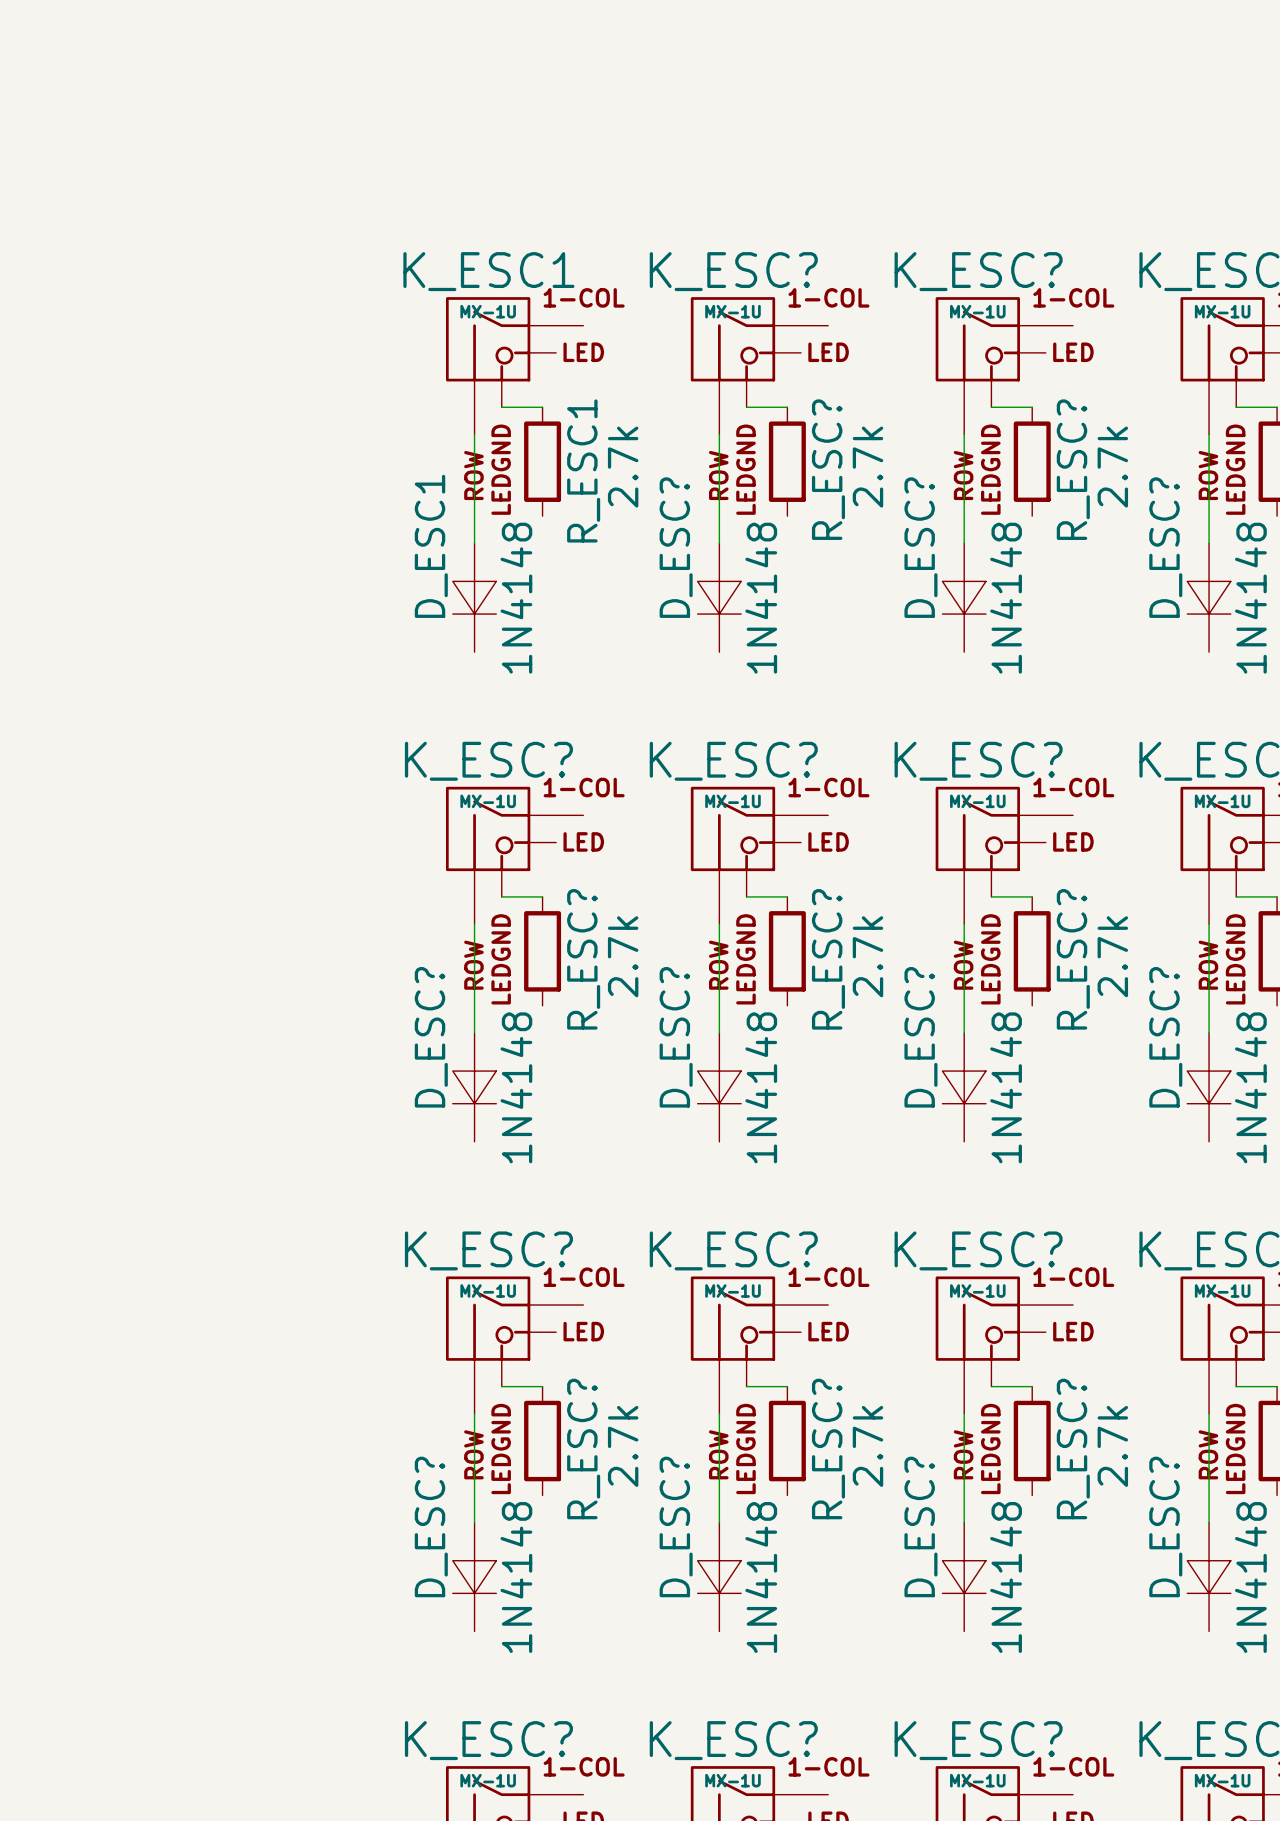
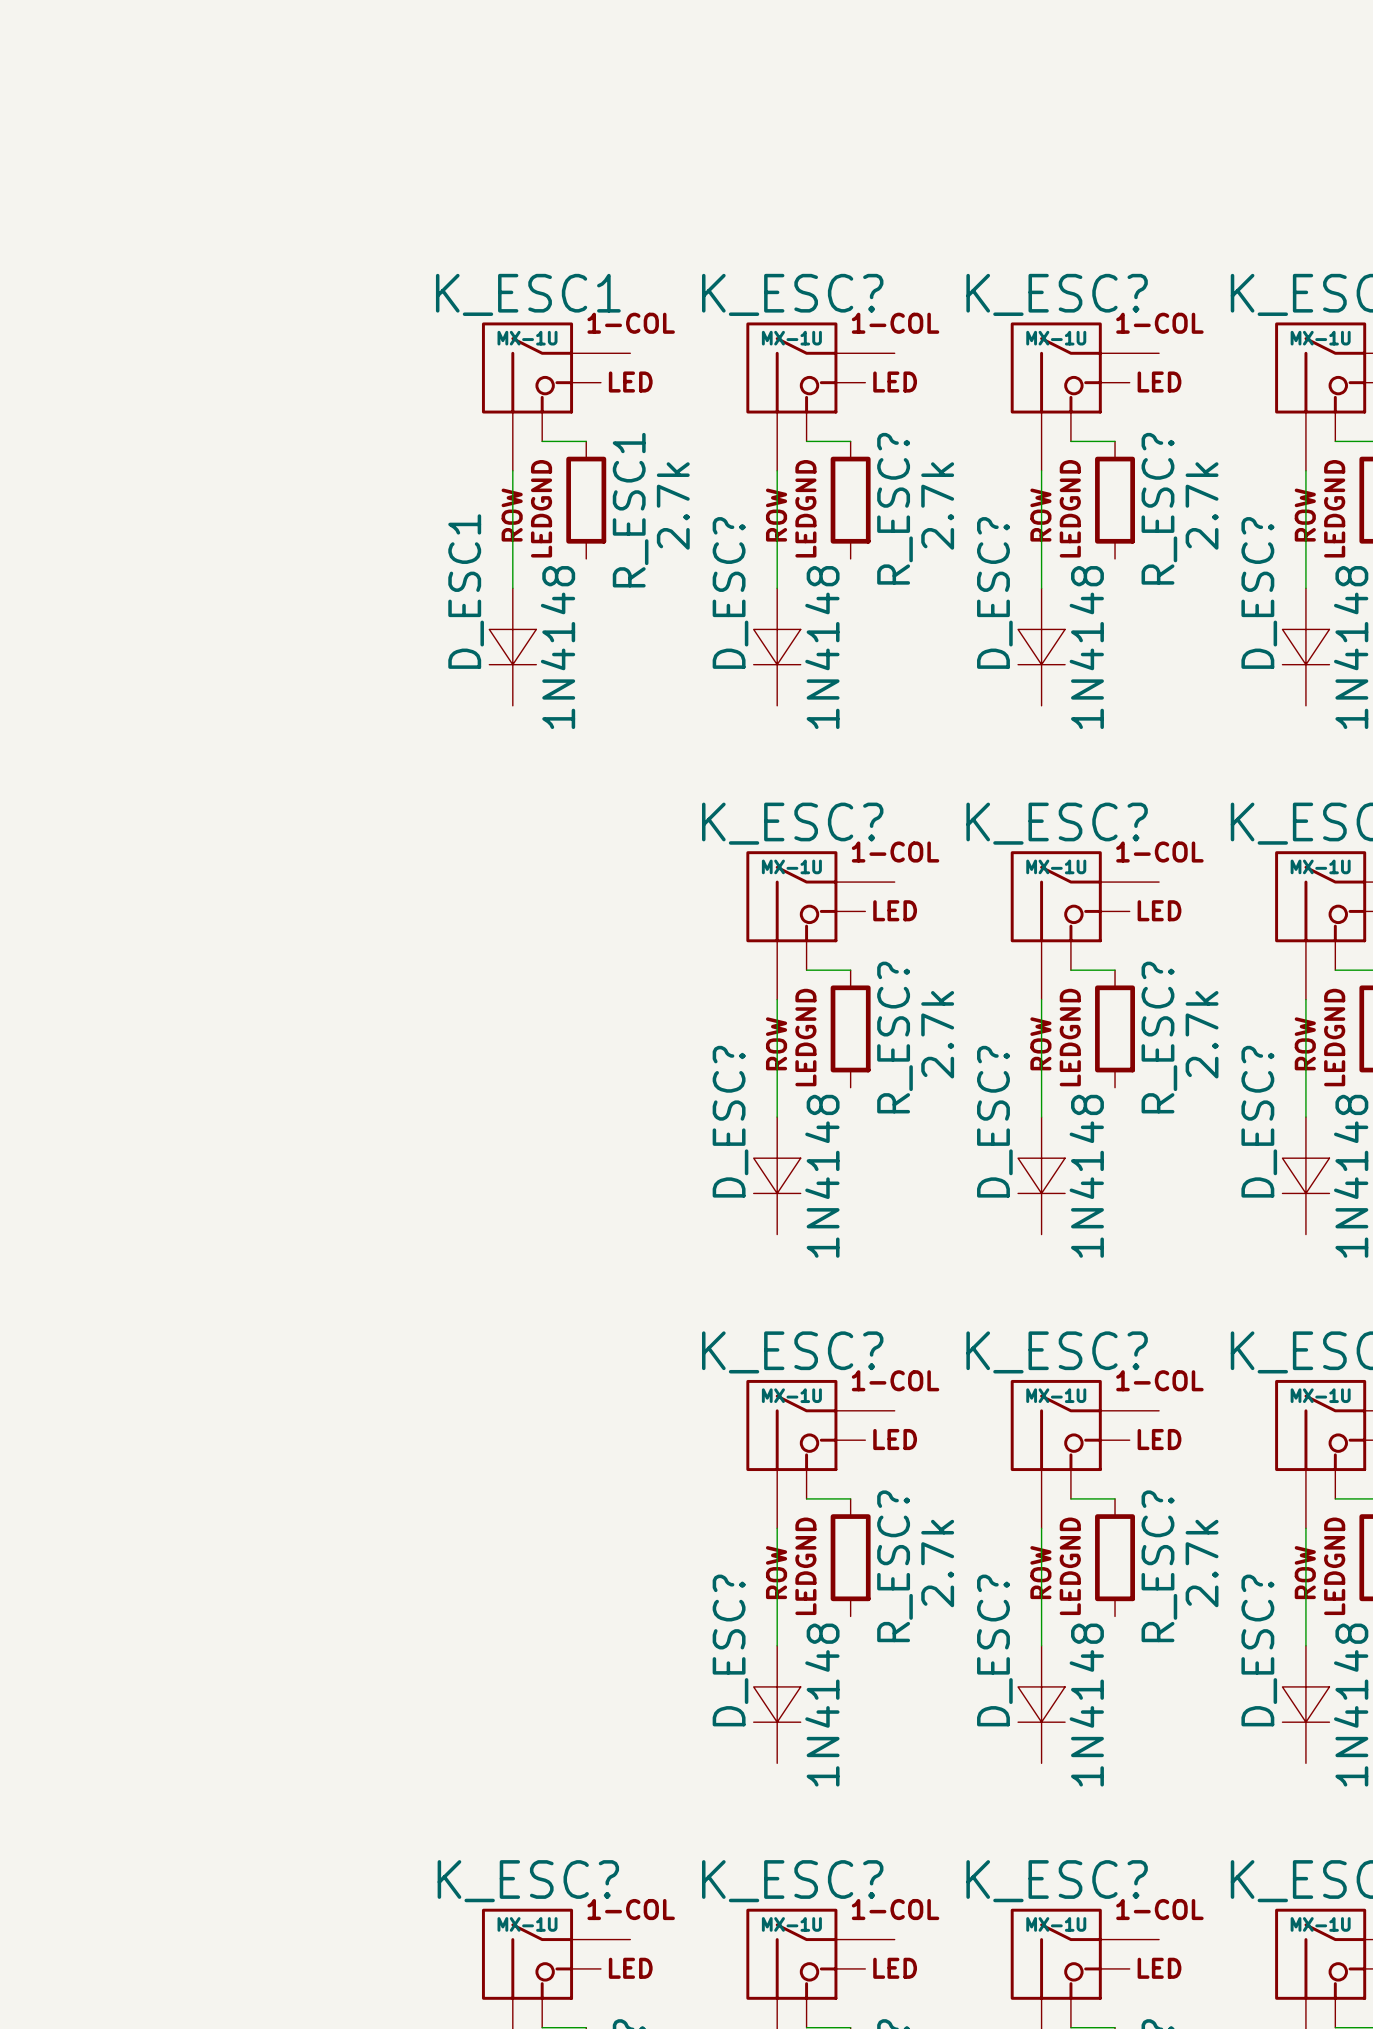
K_ESC?: MX-1U (514, 855) -> none
wire: (501, 896) (542, 896) -> none
wire: (474, 924) (474, 1032) -> none
R_ESC?: 2.7k (542, 951) -> none
D_ESC?: 1N4148 (474, 1087) -> none
K_ESC?: MX-1U (514, 1345) -> none
wire: (501, 1386) (542, 1386) -> none
wire: (474, 1413) (474, 1522) -> none
R_ESC?: 2.7k (542, 1441) -> none
D_ESC?: 1N4148 (474, 1577) -> none

